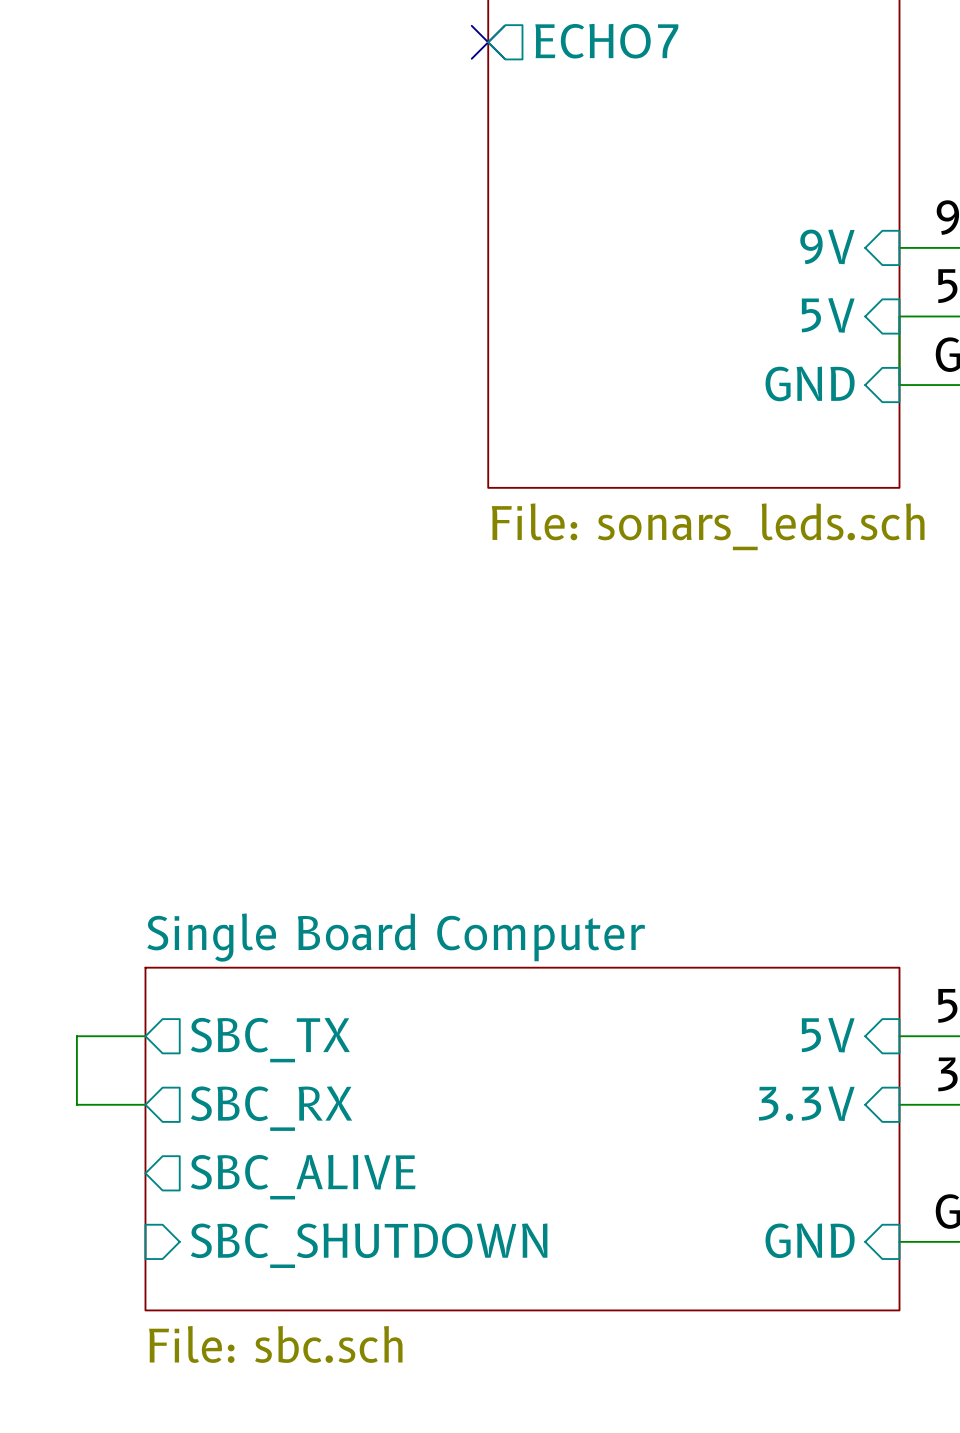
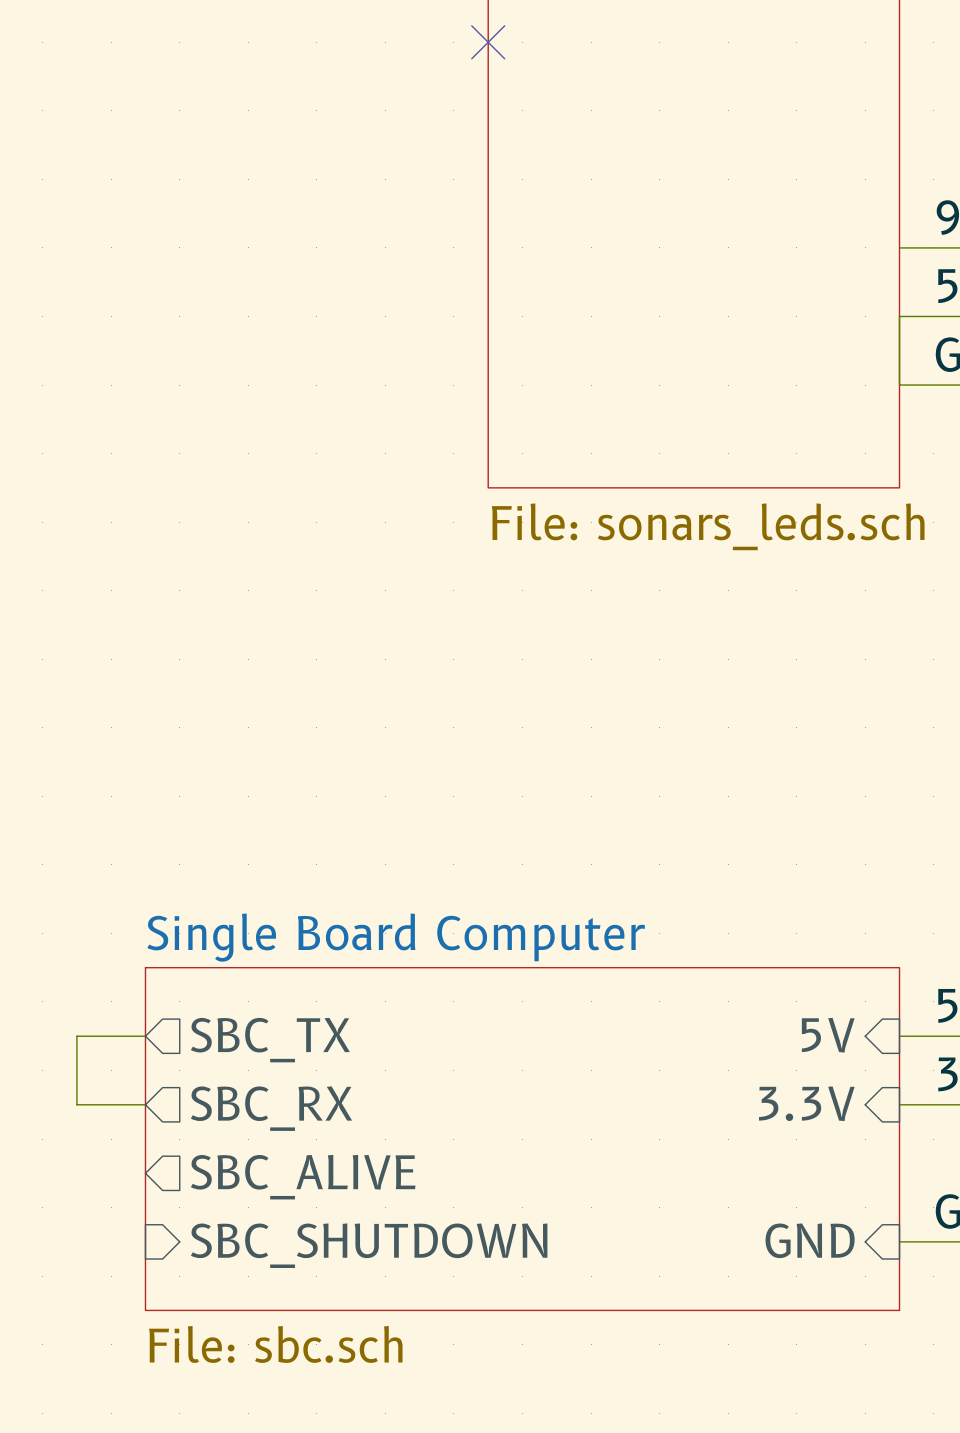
sheet pin: ECHO7 (606, 41) -> none
sheet pin: 9V (827, 246) -> none
sheet pin: 5V (828, 315) -> none
sheet pin: GND (810, 383) -> none

